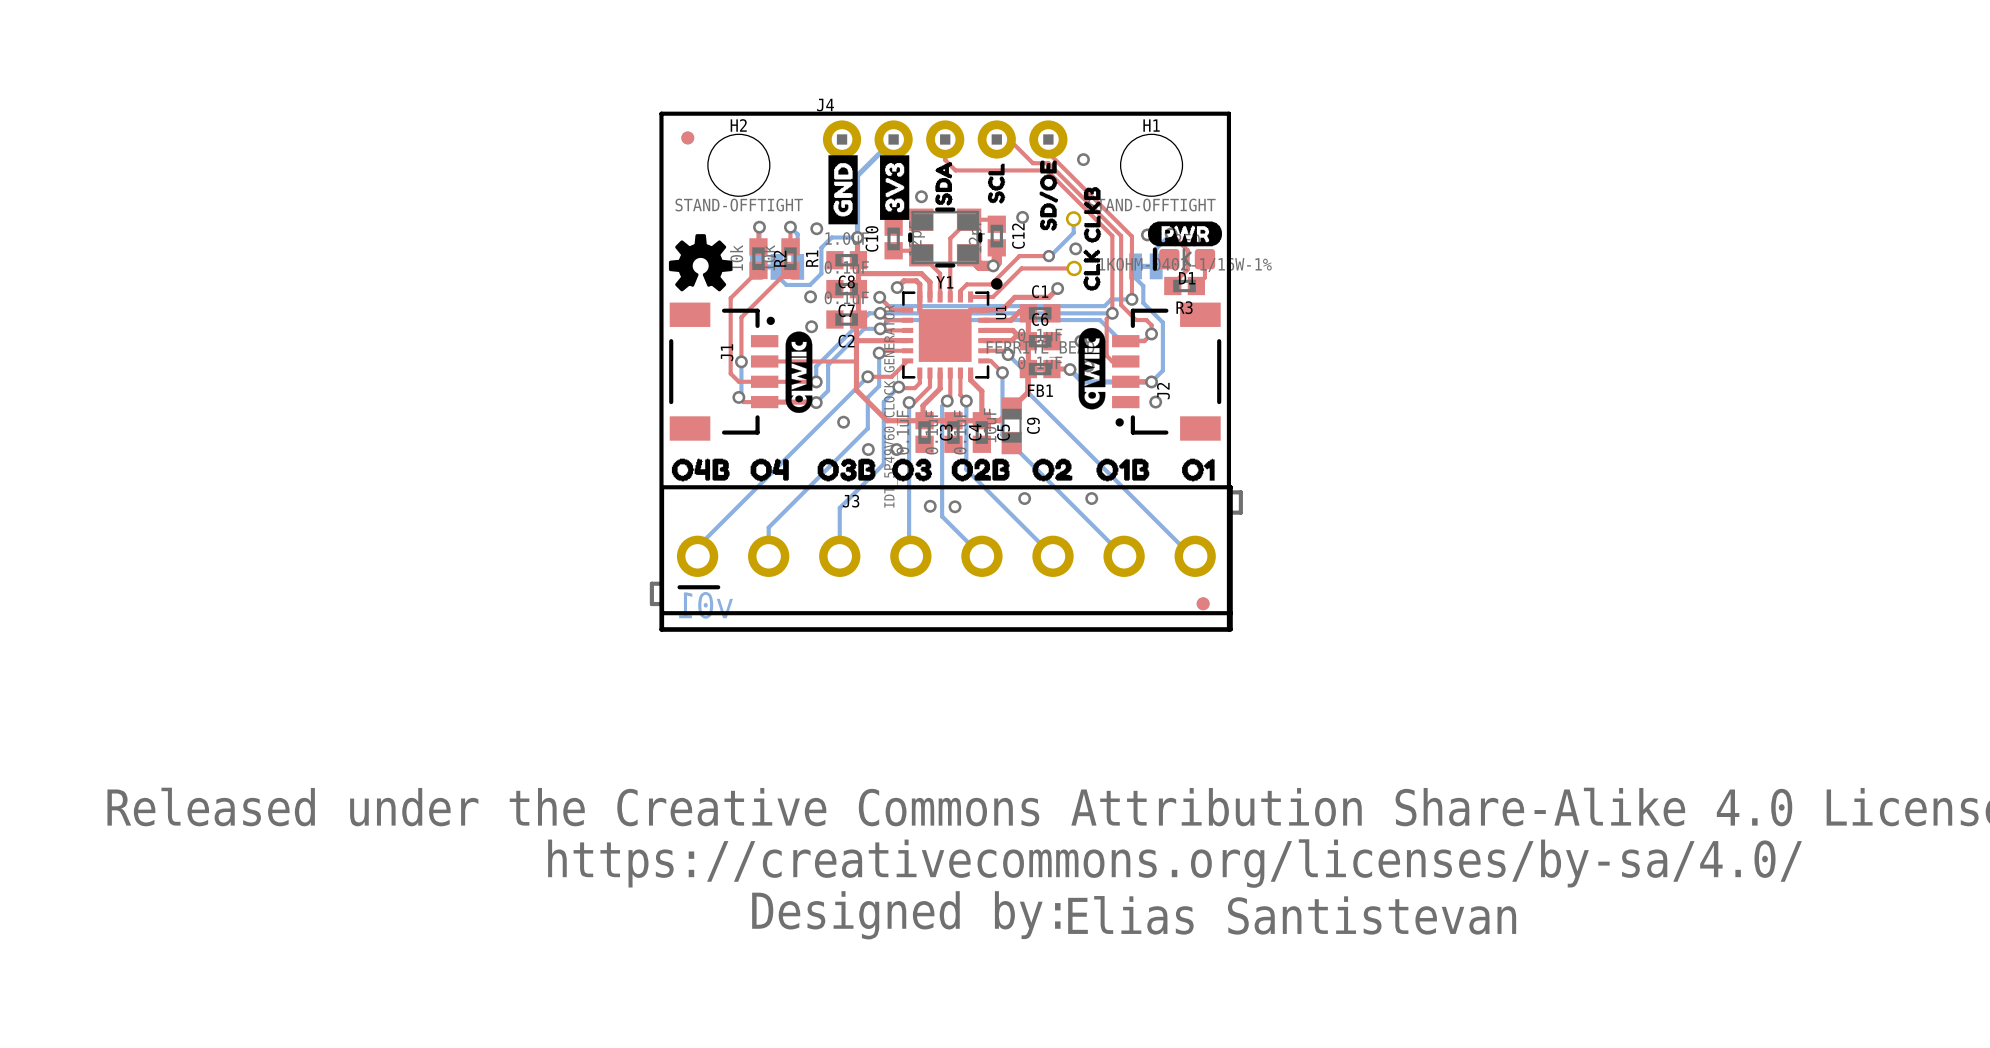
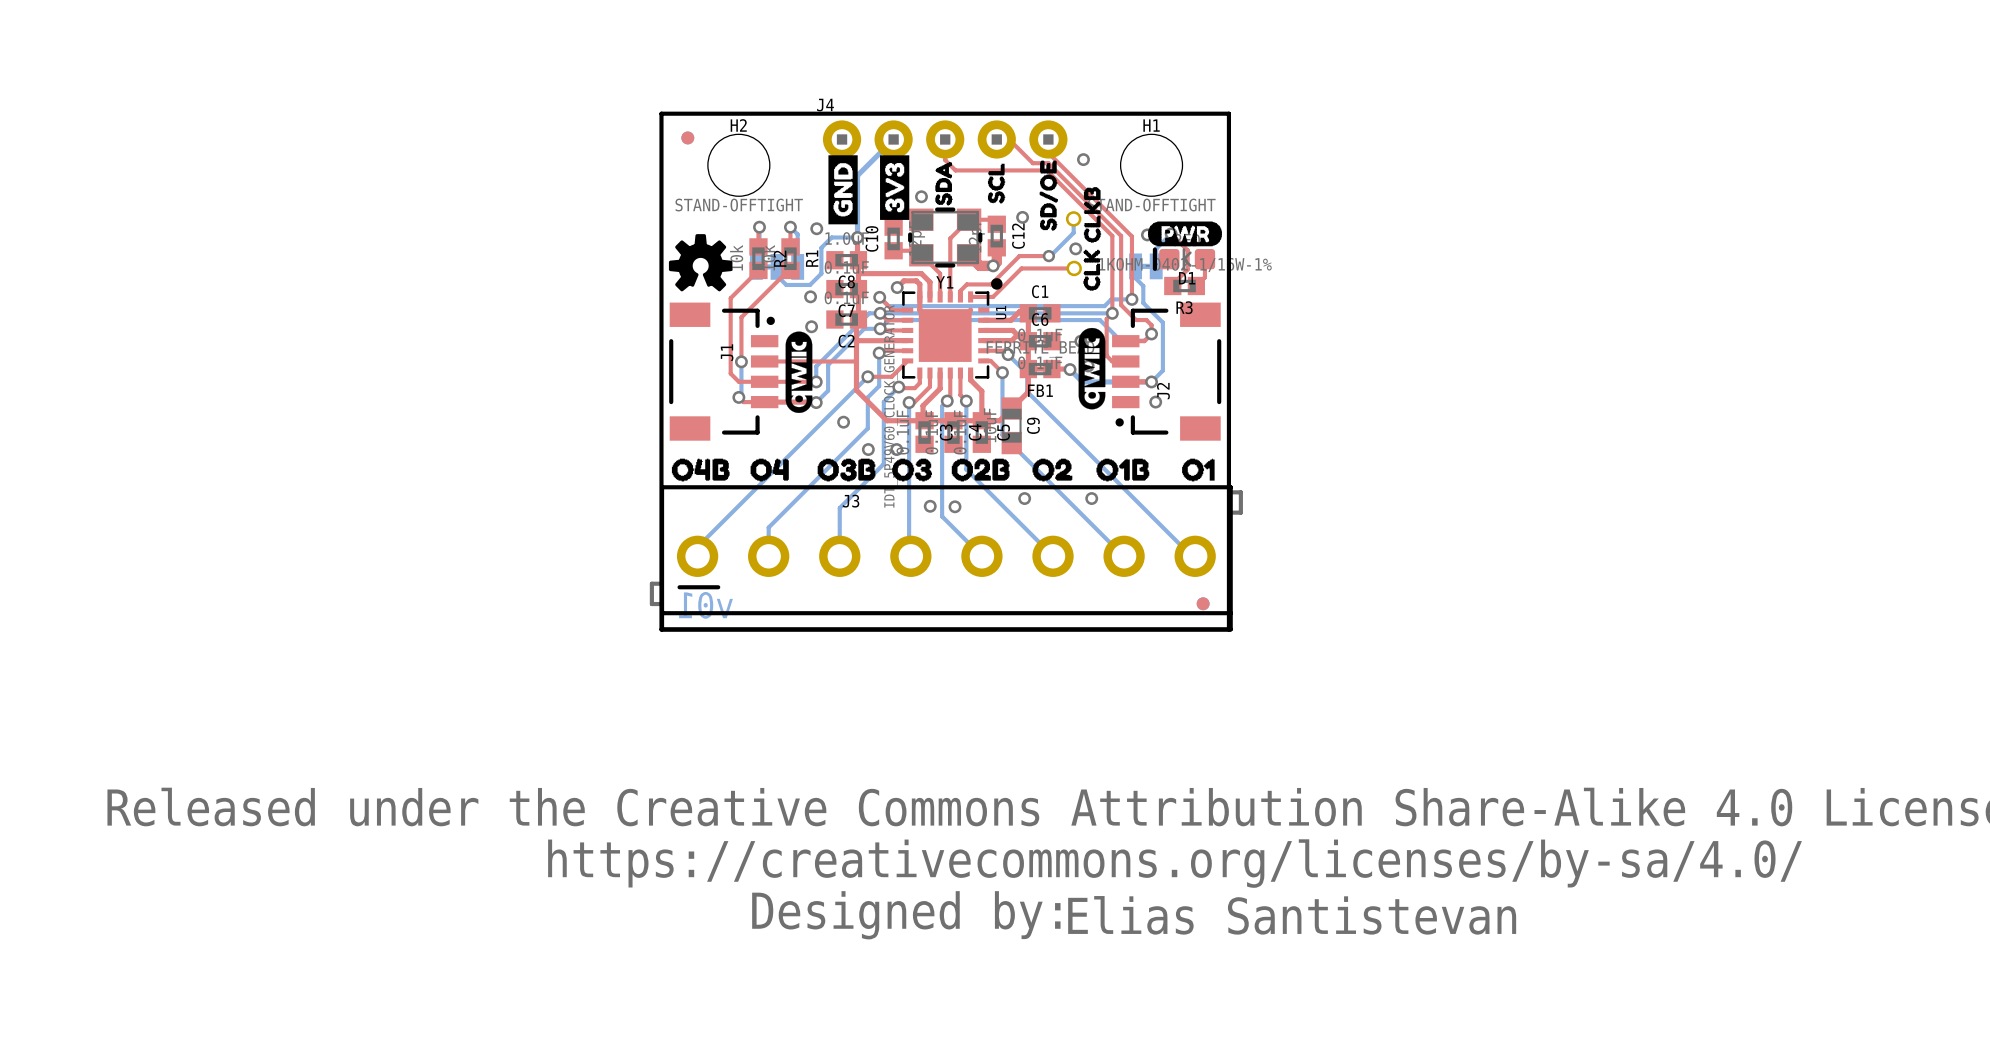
top track: (1057, 288) (1048, 297) (1014, 297) (1002, 309) (970, 310) -> none
via: (1057, 288) -> none

